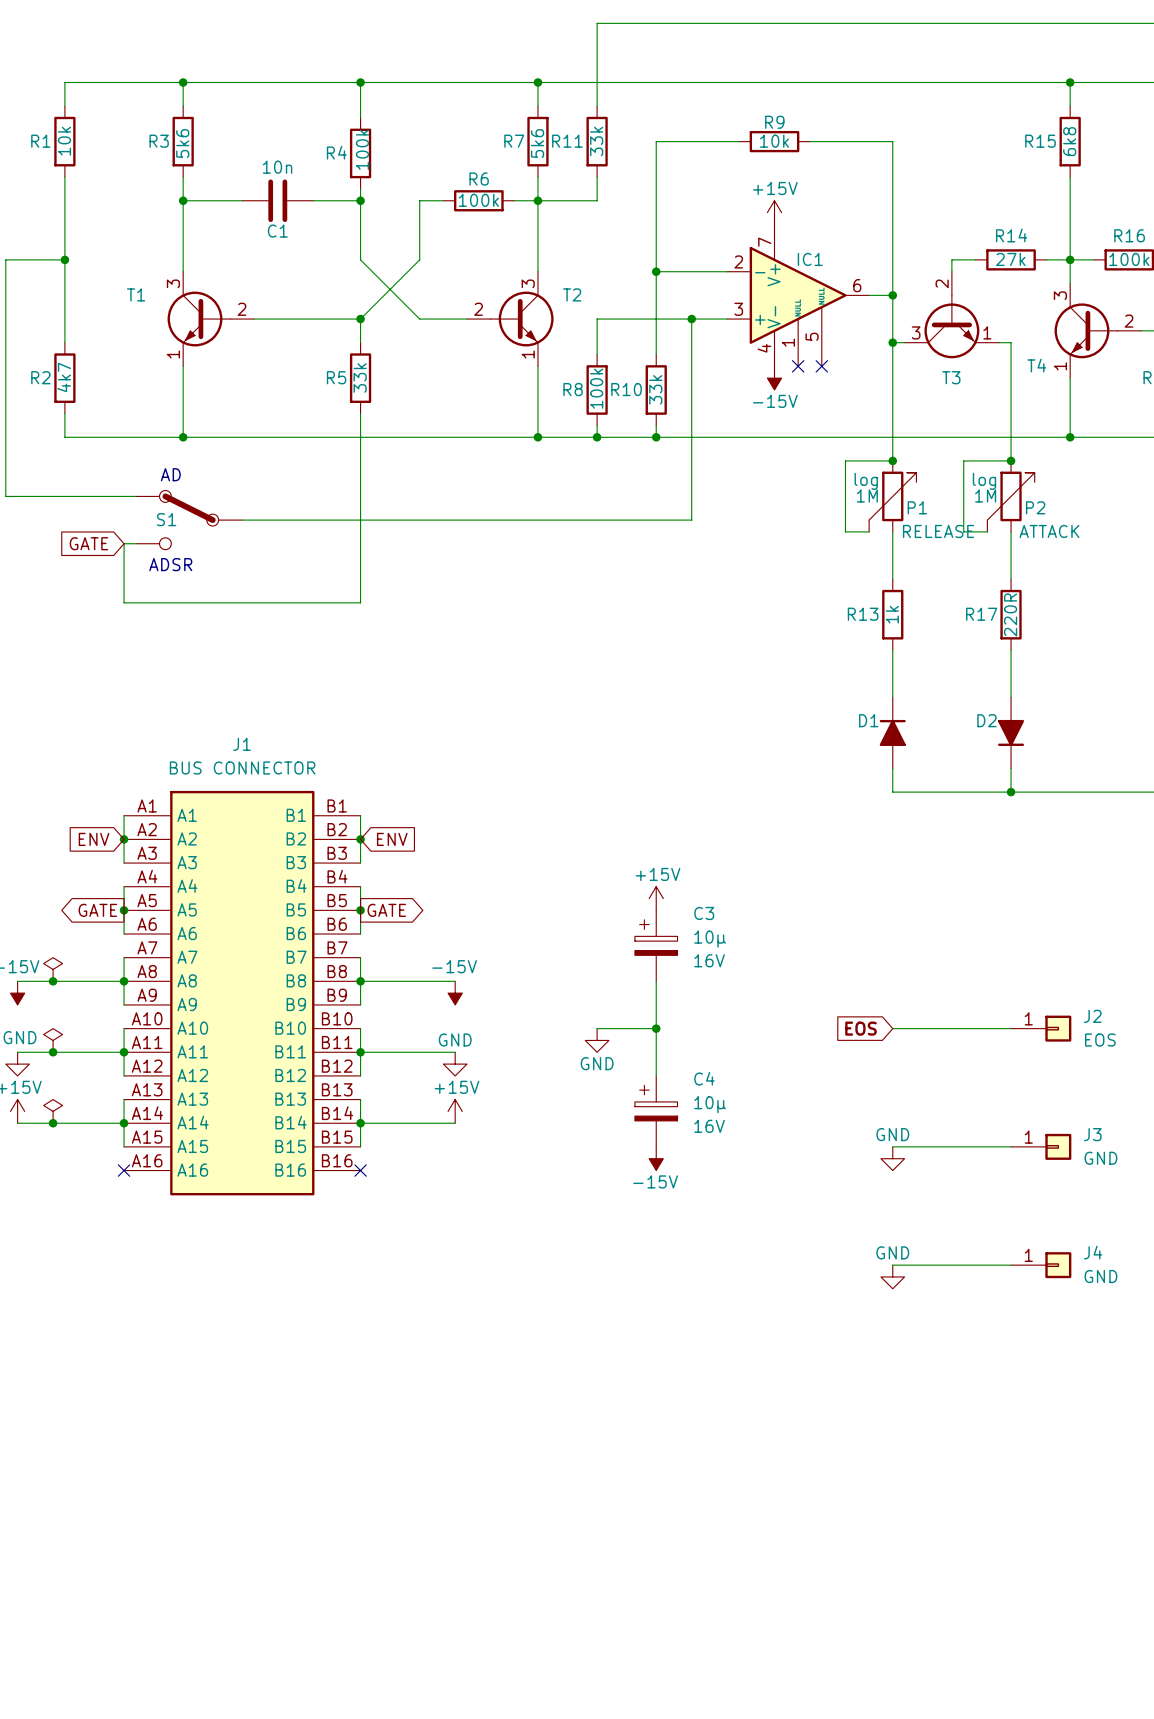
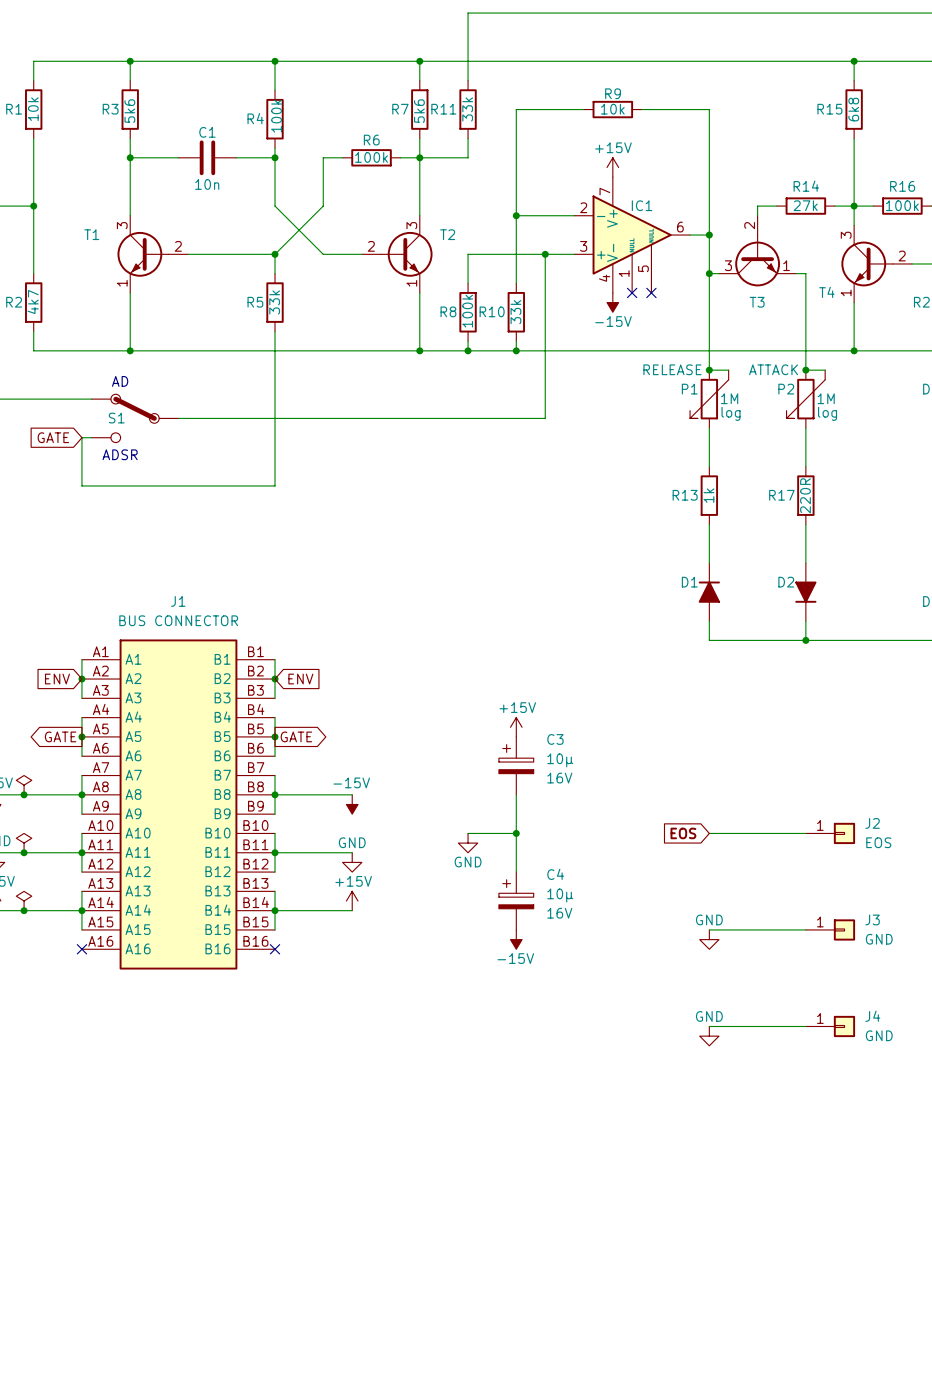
C1 value position: 10n (277, 167) -> 10n (207, 184)
C1 name position: C1 (277, 231) -> C1 (207, 132)
wire: (892, 460) (845, 460) (845, 531) (869, 531) -> (709, 370) (728, 370)
wire: (1011, 460) (963, 460) (963, 531) (987, 531) -> (805, 370) (825, 370)
P1 rotation: 0° (892, 496) -> 180° (709, 399)
P2 rotation: 0° (1011, 496) -> 180° (805, 399)

